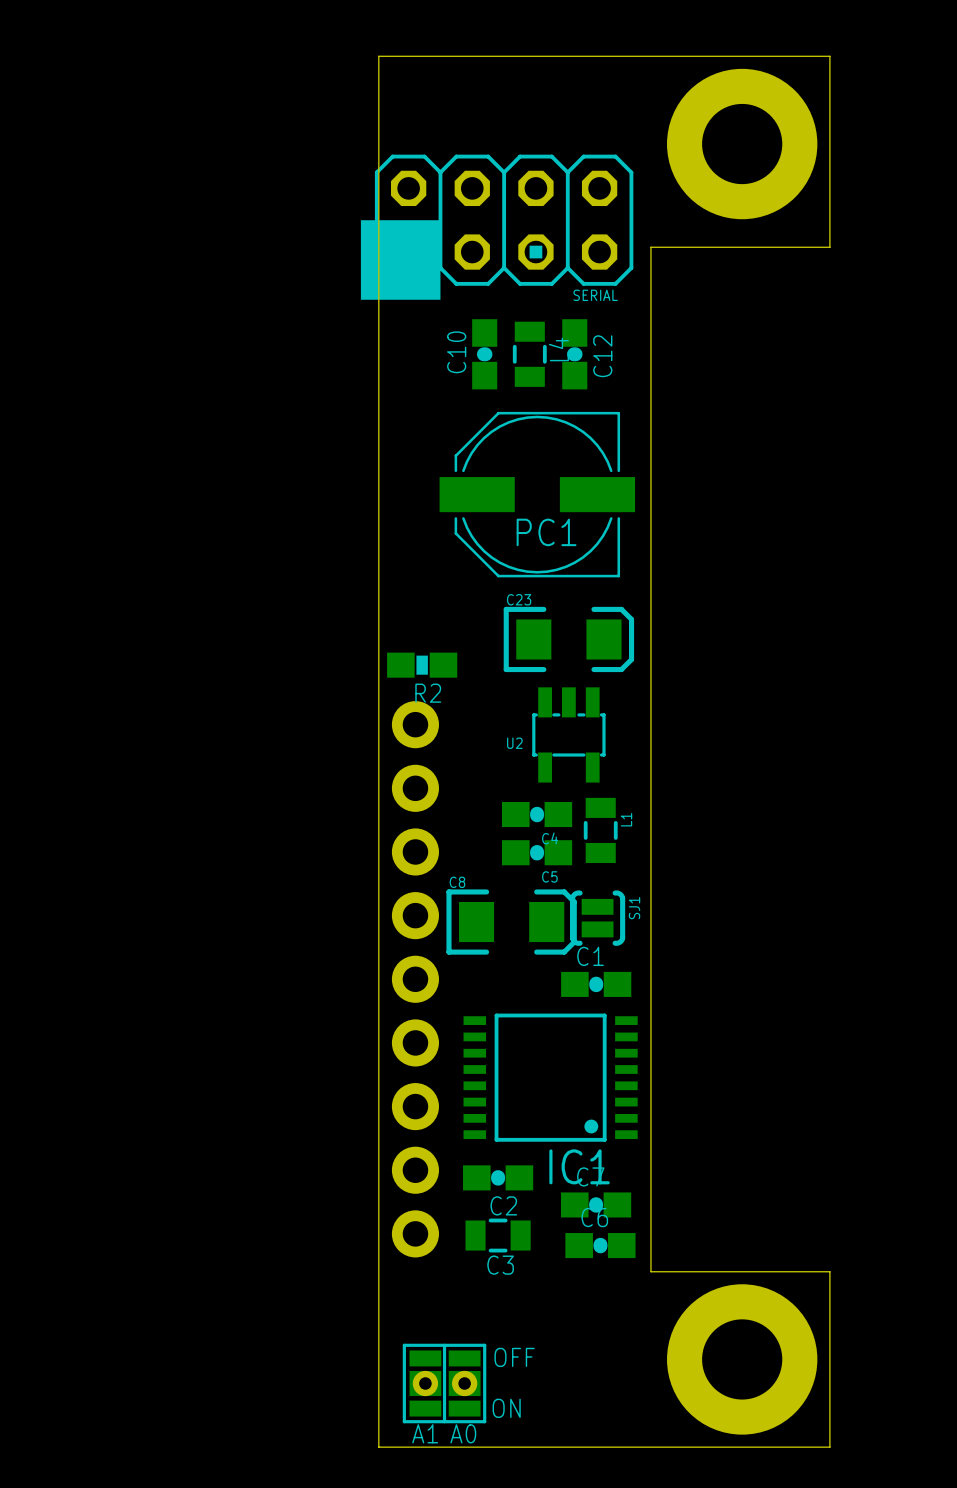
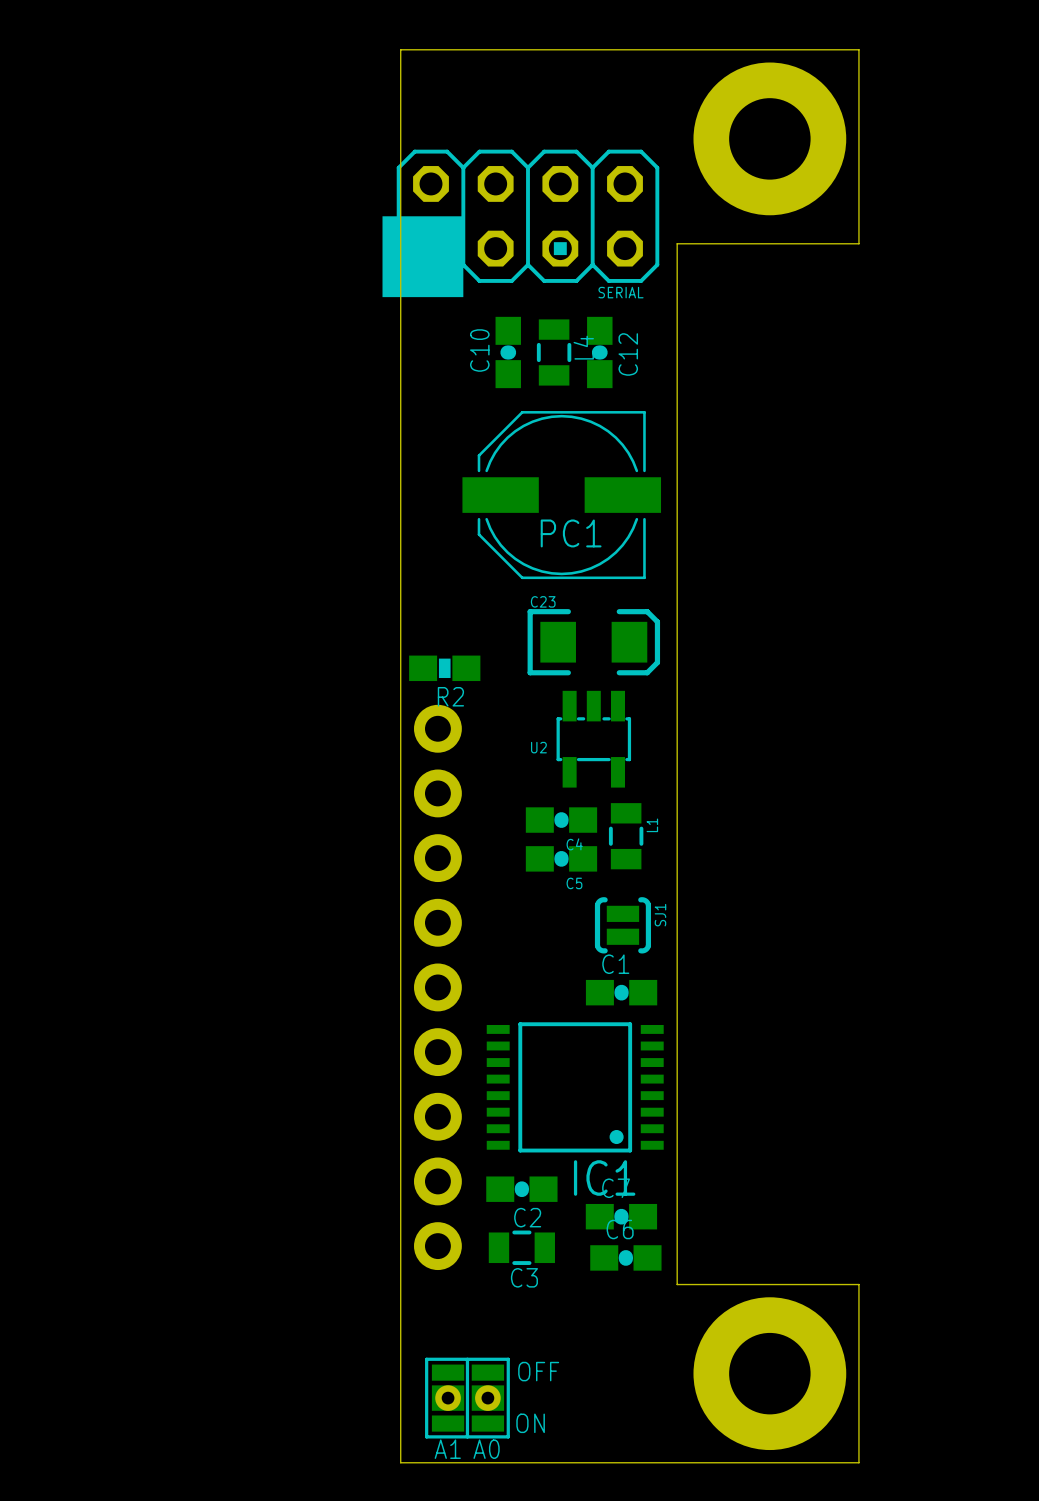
C8: (511, 922) -> none

